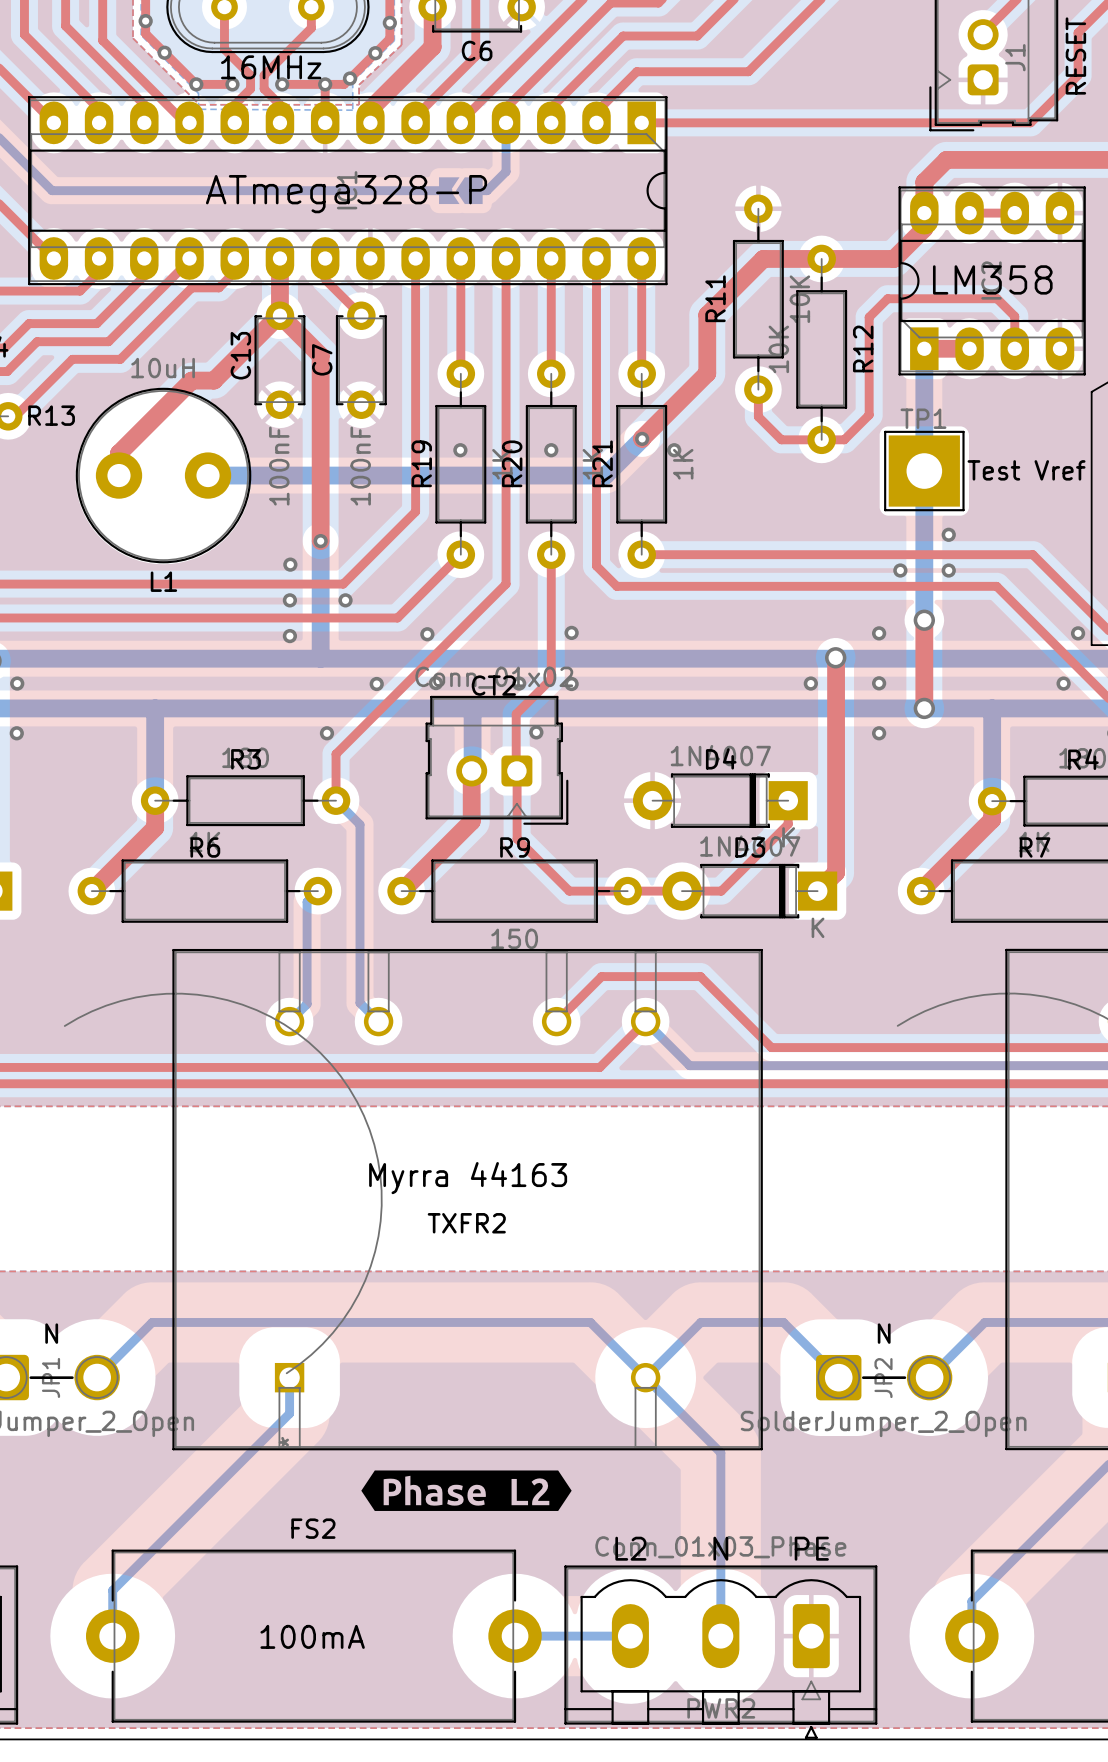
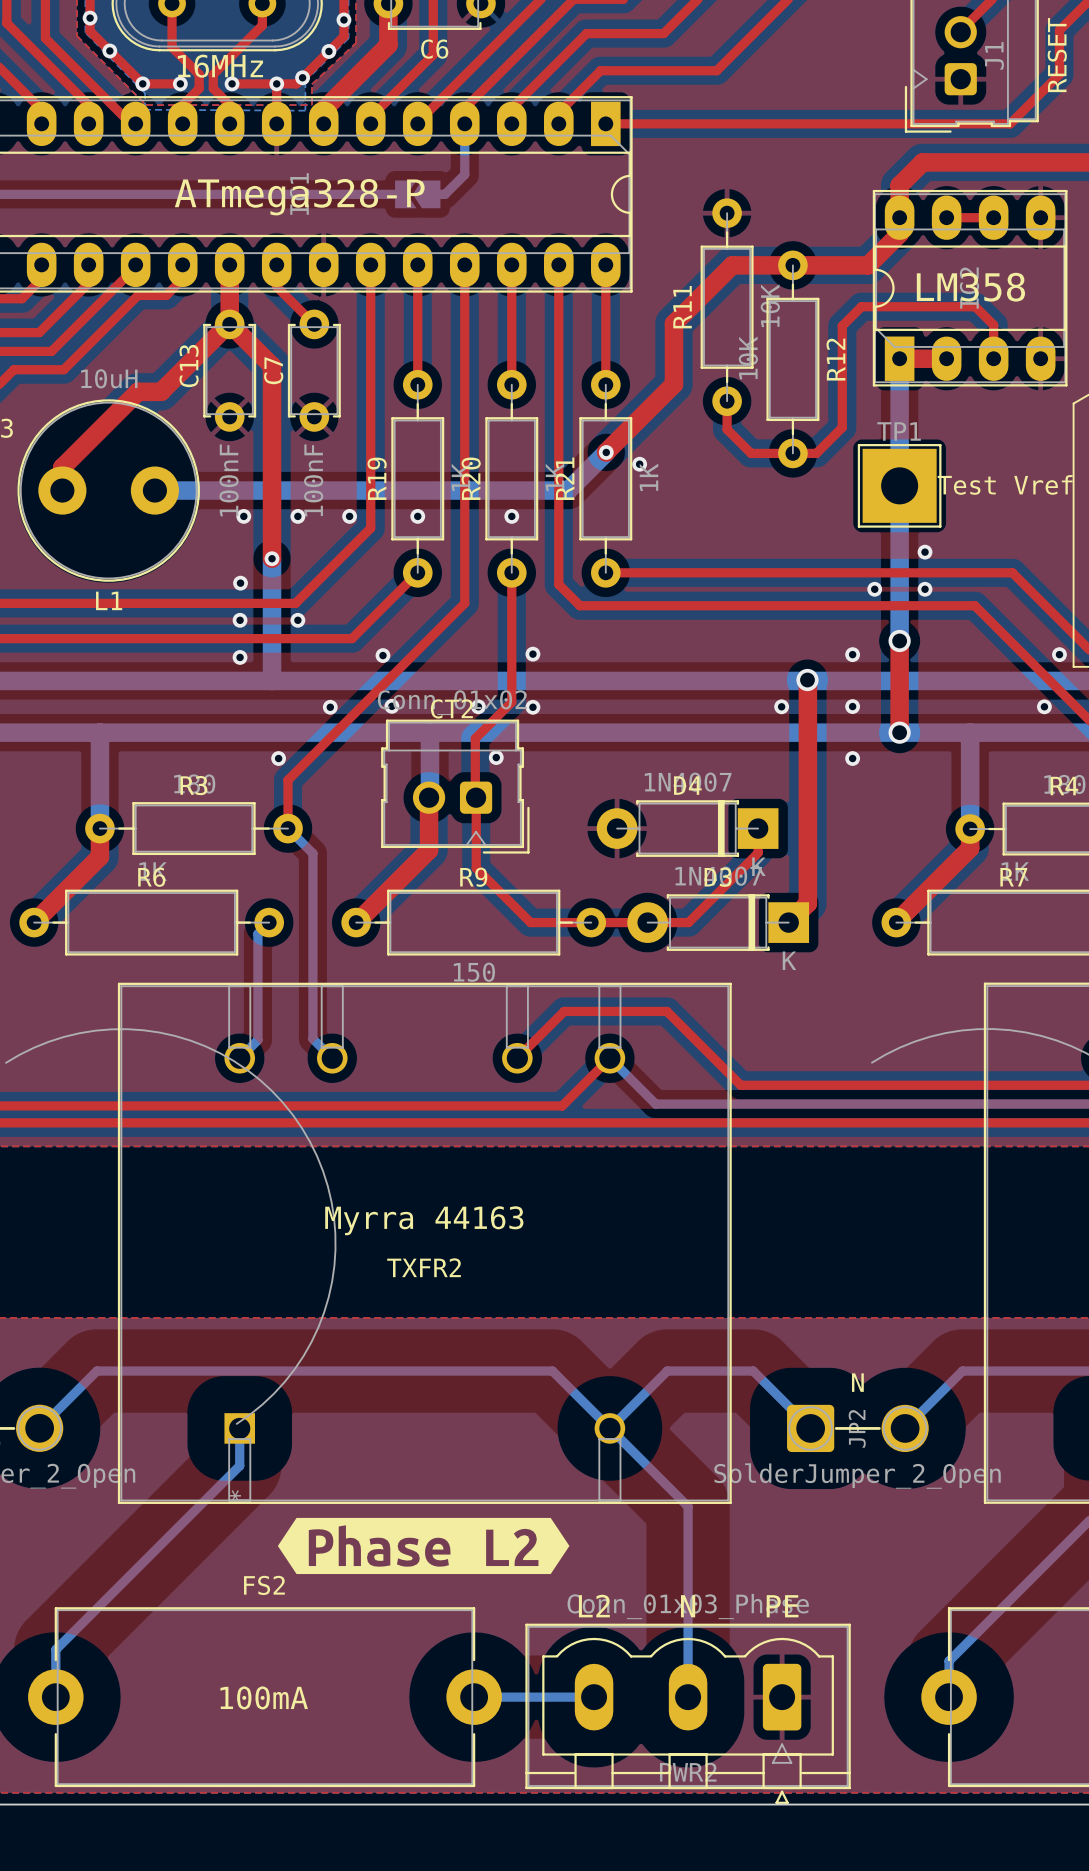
via: (460, 450) -> none
via position: (551, 450) -> (511, 516)
via: none -> (243, 516)
via: none -> (297, 516)
via: none -> (349, 516)
via: none -> (417, 516)
drawing shape: [361, 1470, 572, 1511] -> [277, 1517, 570, 1575]

